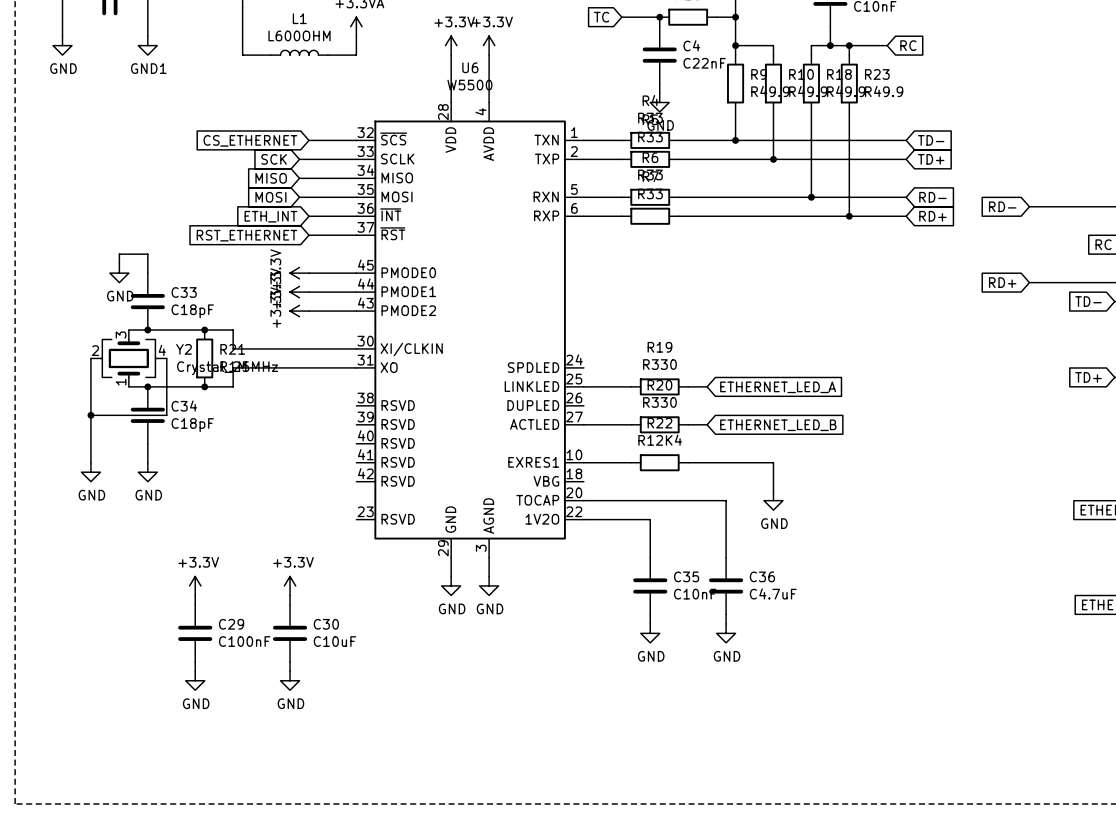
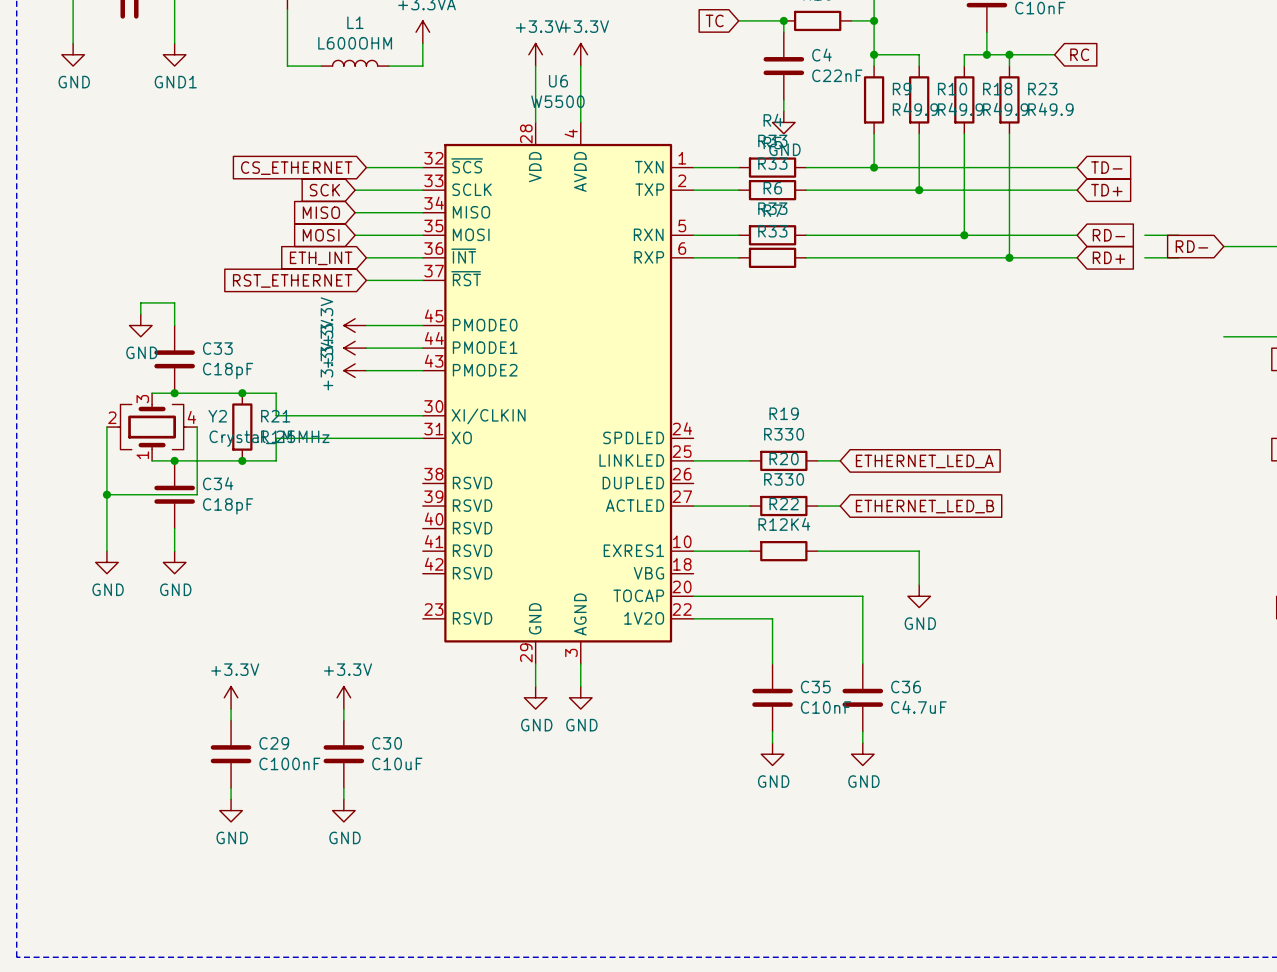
wire: none -> (1144, 235) (1178, 235)
wire: none -> (1144, 257) (1178, 257)
global label: RD+ (1002, 282) -> none

